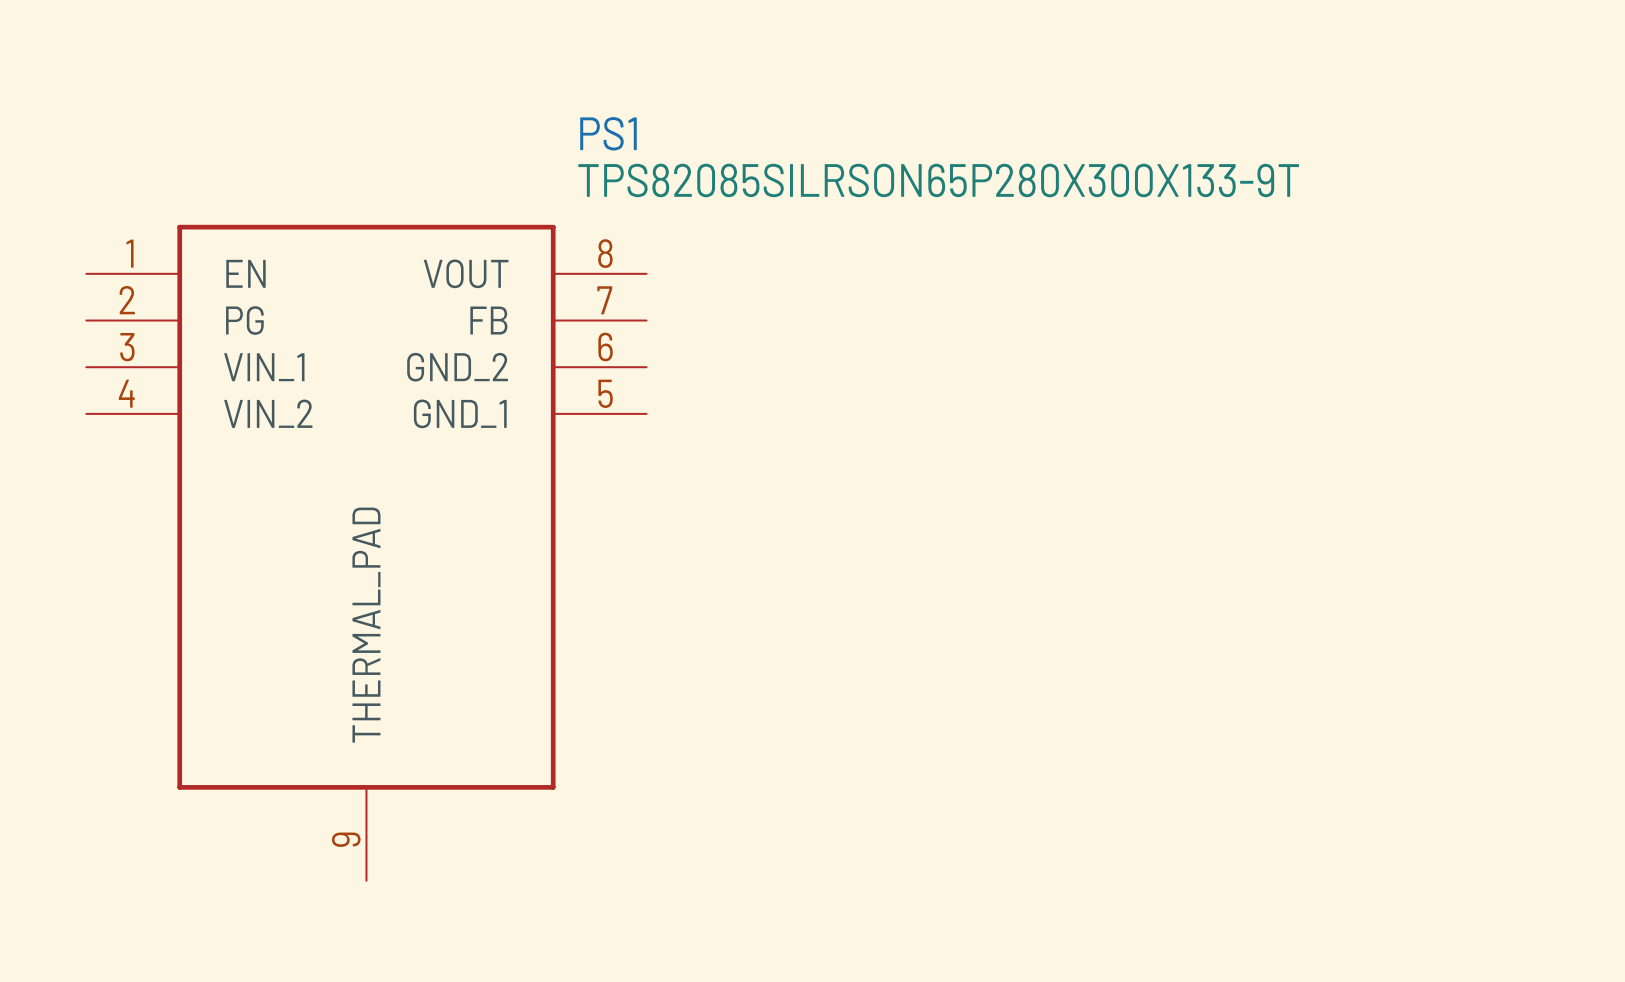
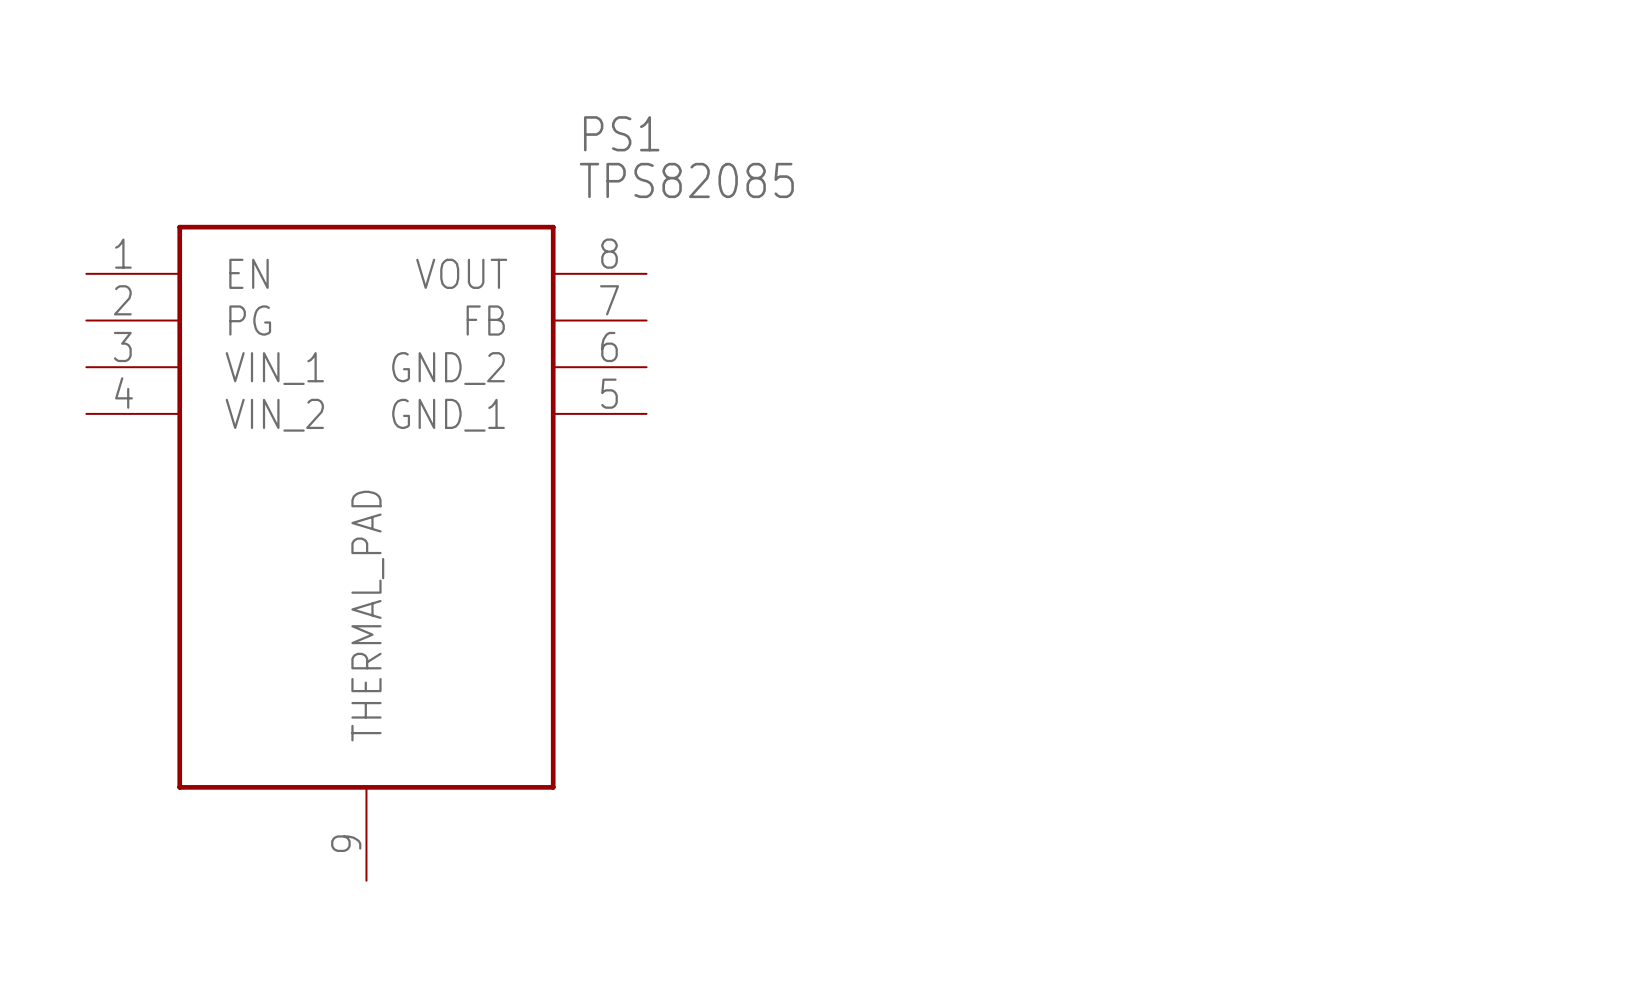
PS1 value: TPS82085SILRSON65P280X300X133-9T (938, 180) -> TPS82085 (686, 180)

